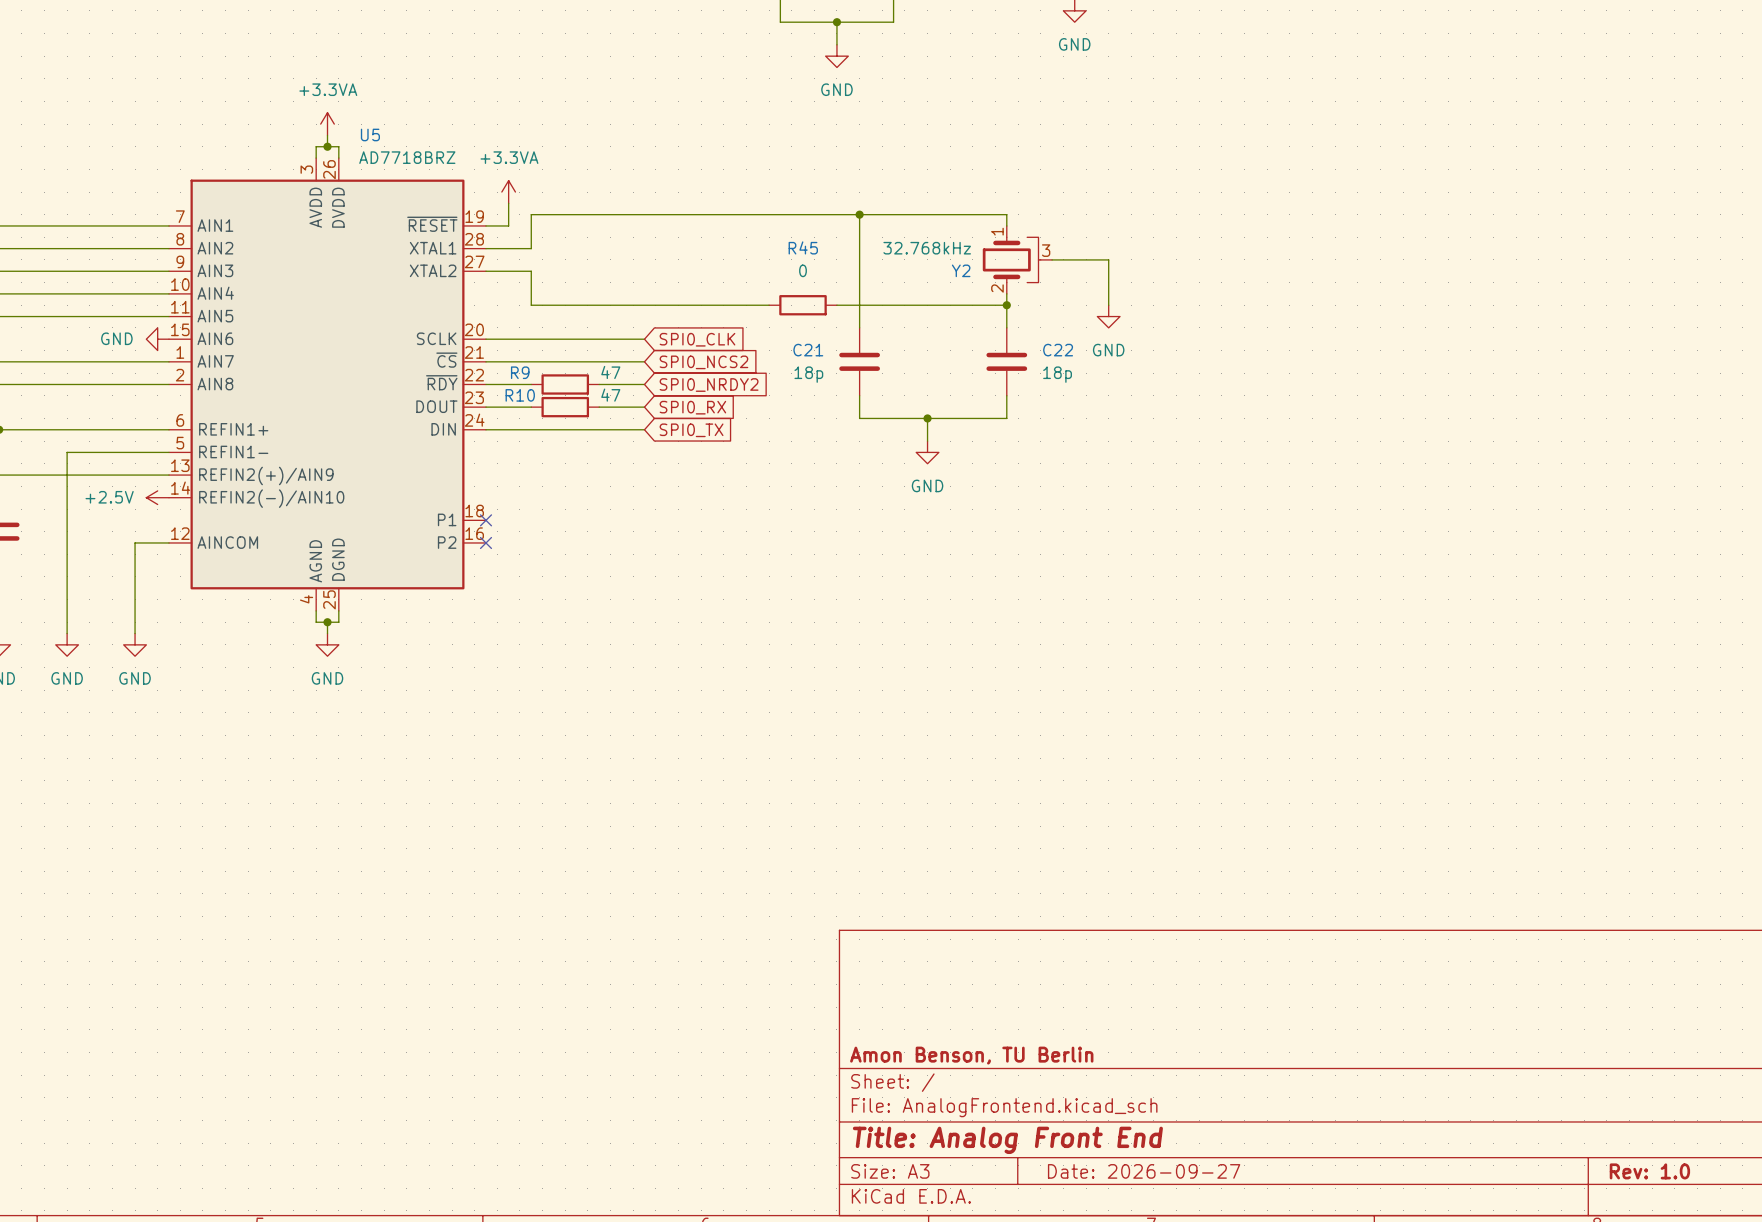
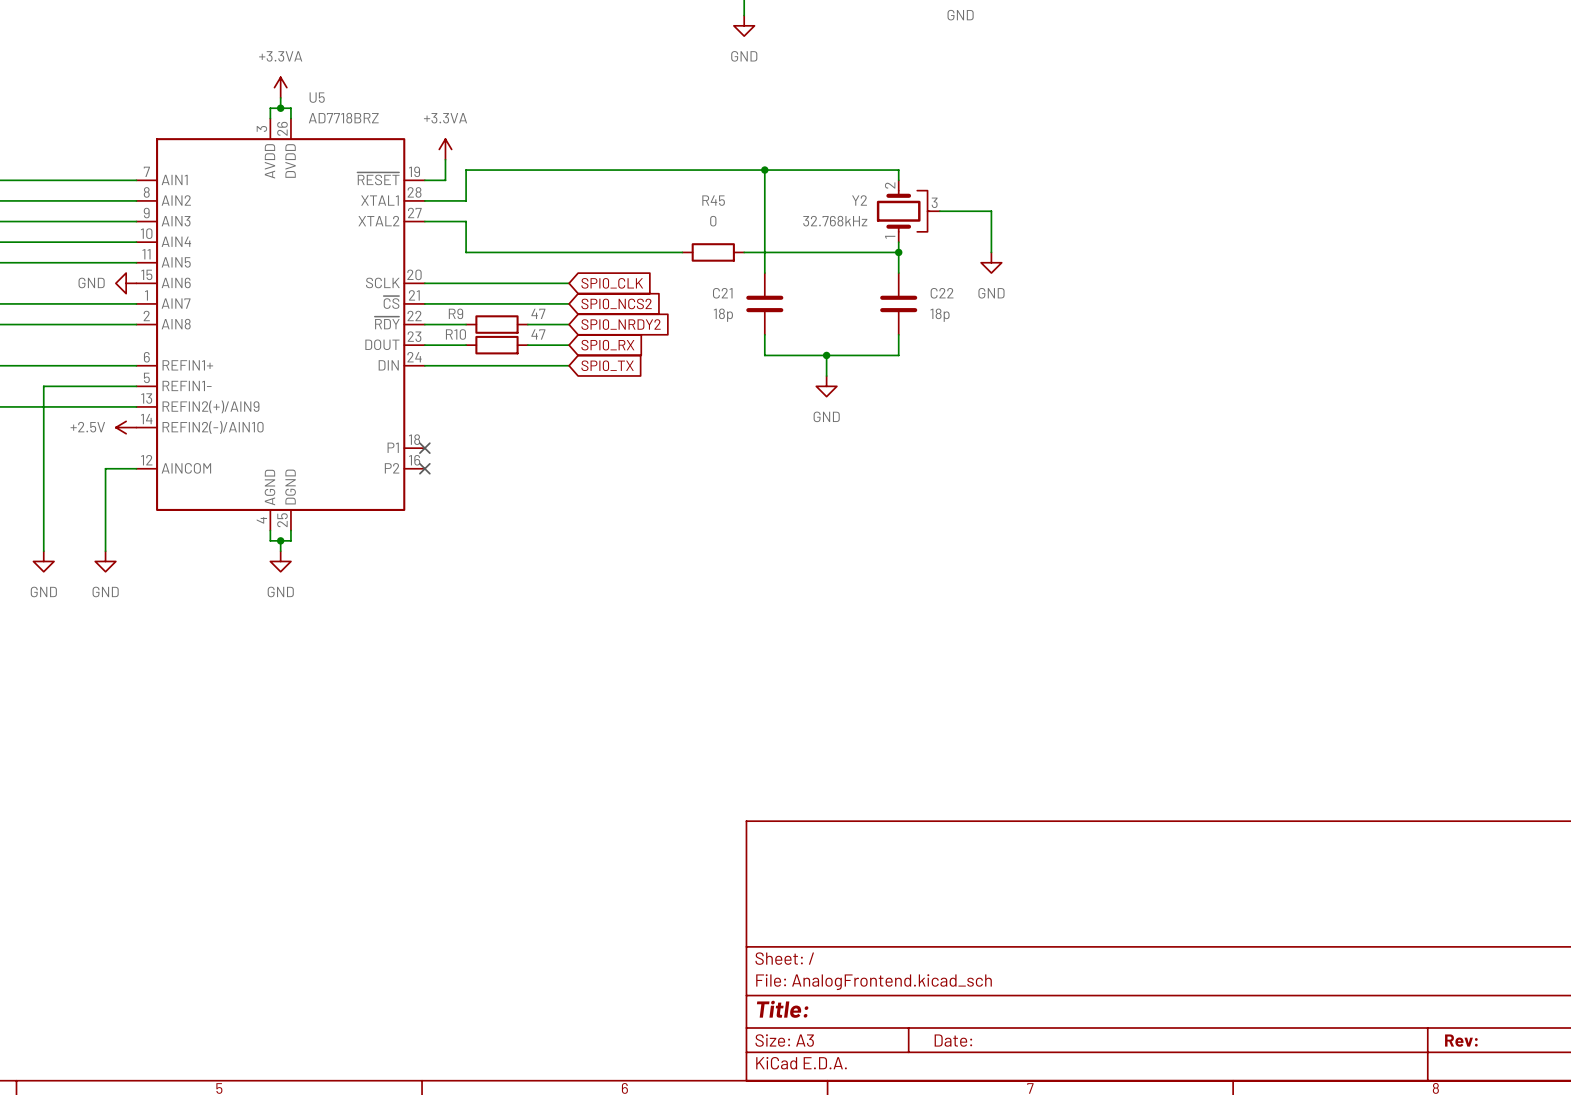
Y2 flip: as is (1011, 259) -> up-down (903, 211)
title block: Amon Benson, TU Berlin (971, 1055) -> none
title block: Title: Analog Front End (1007, 1140) -> Title: (782, 1009)
title block: Date: 2026-09-27 (1144, 1171) -> Date: (953, 1040)
title block: Rev: 1.0 (1649, 1171) -> Rev: (1461, 1040)

